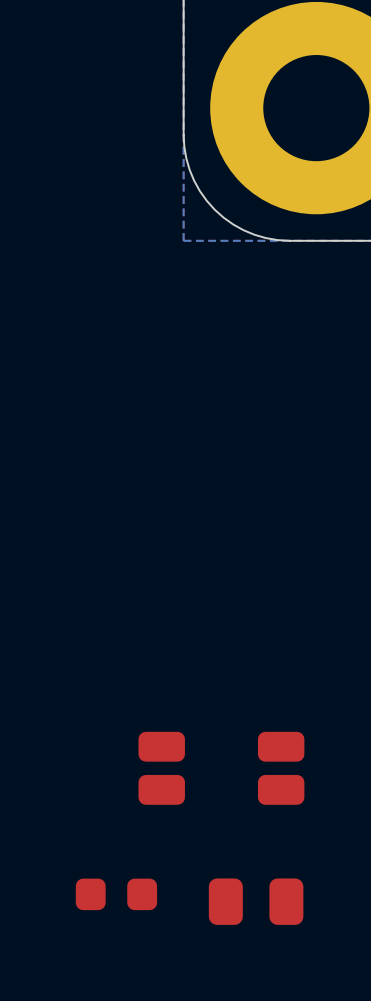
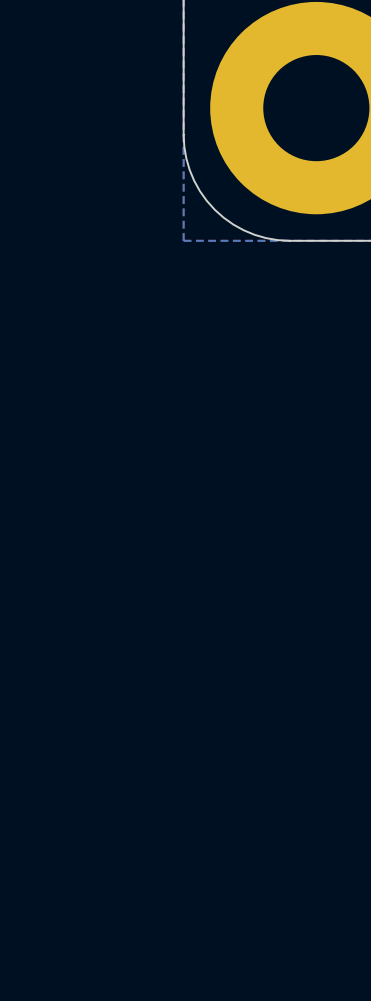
part: (221, 768) -> none
part: (116, 894) -> none
part: (256, 901) -> none

